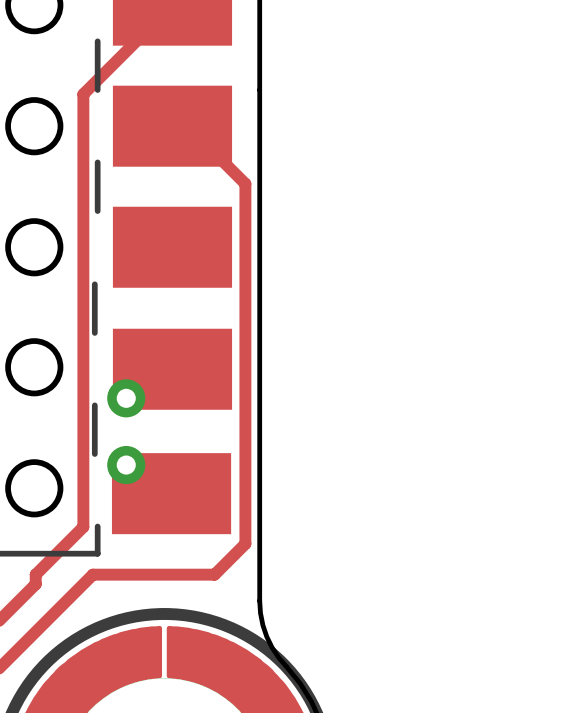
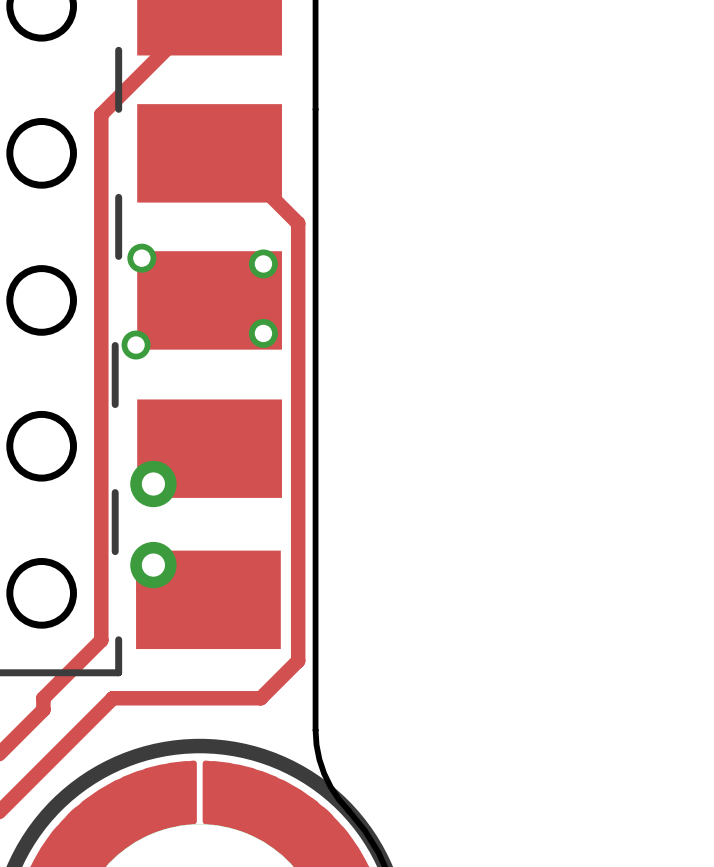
via: none -> (141, 258)
via: none -> (263, 263)
via: none -> (263, 333)
via: none -> (136, 345)

